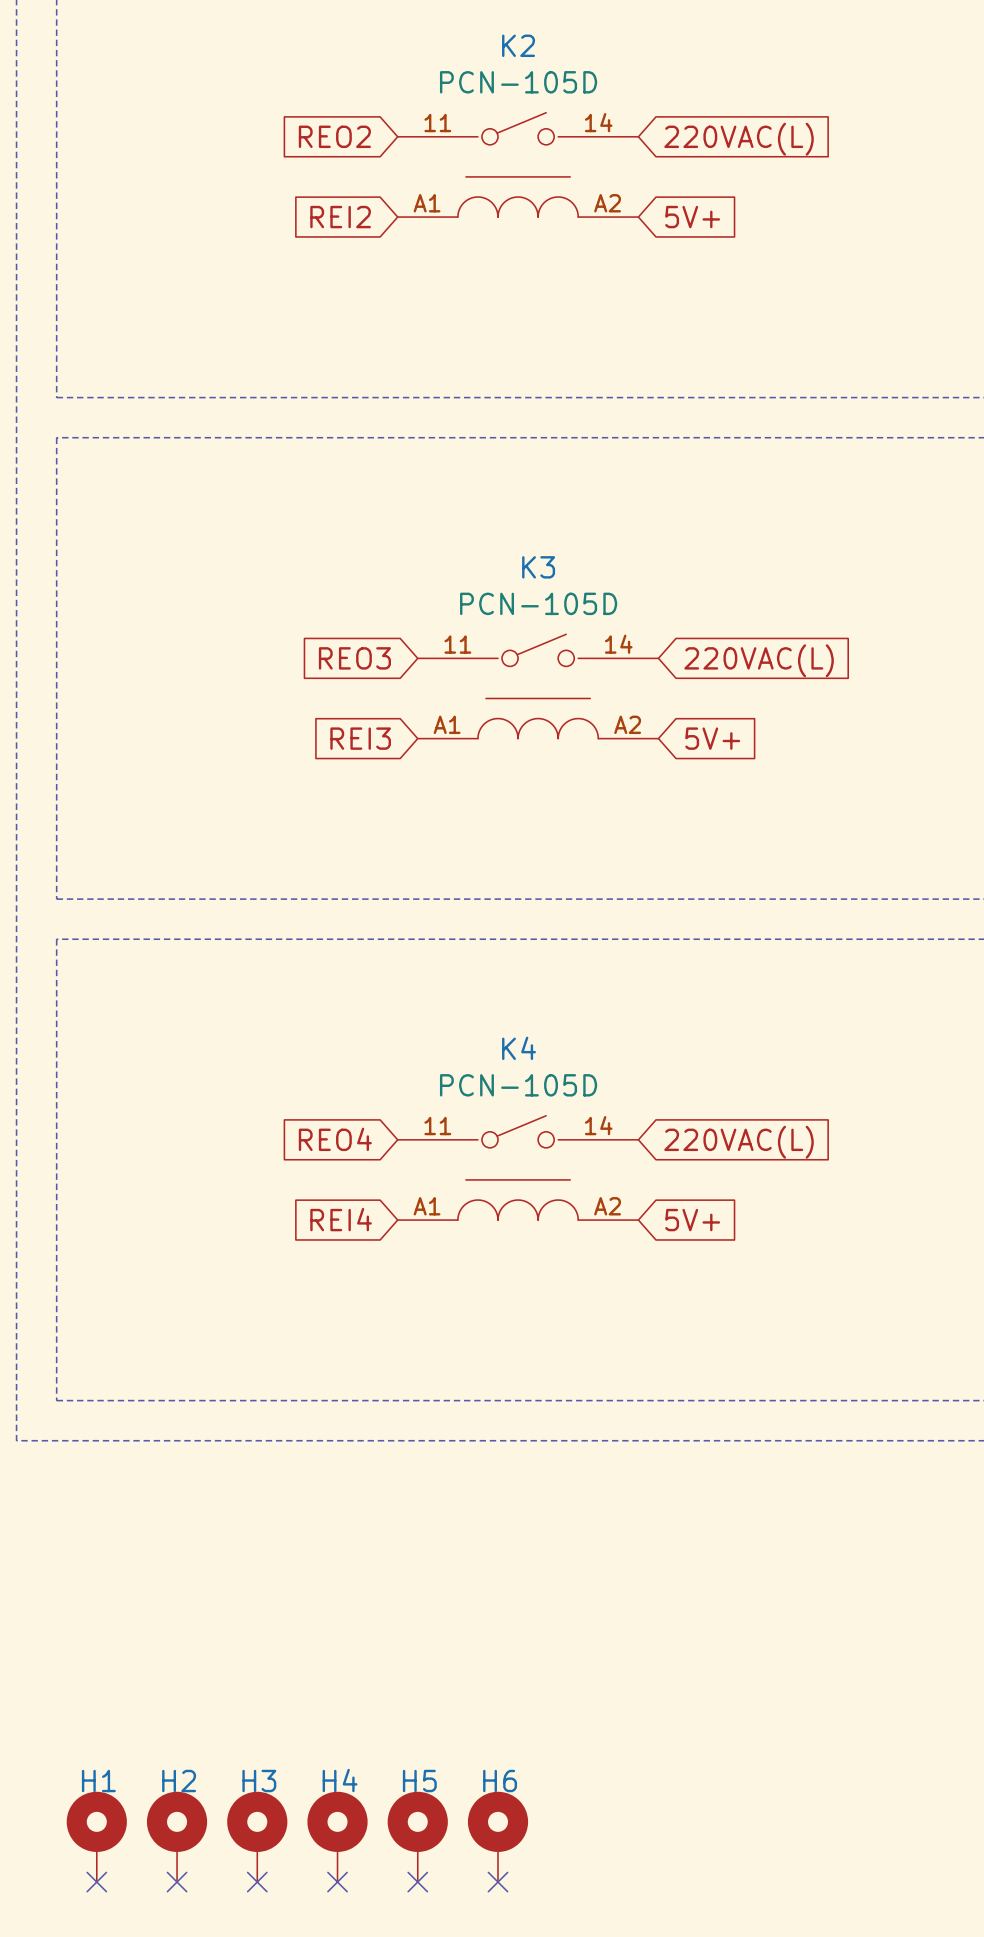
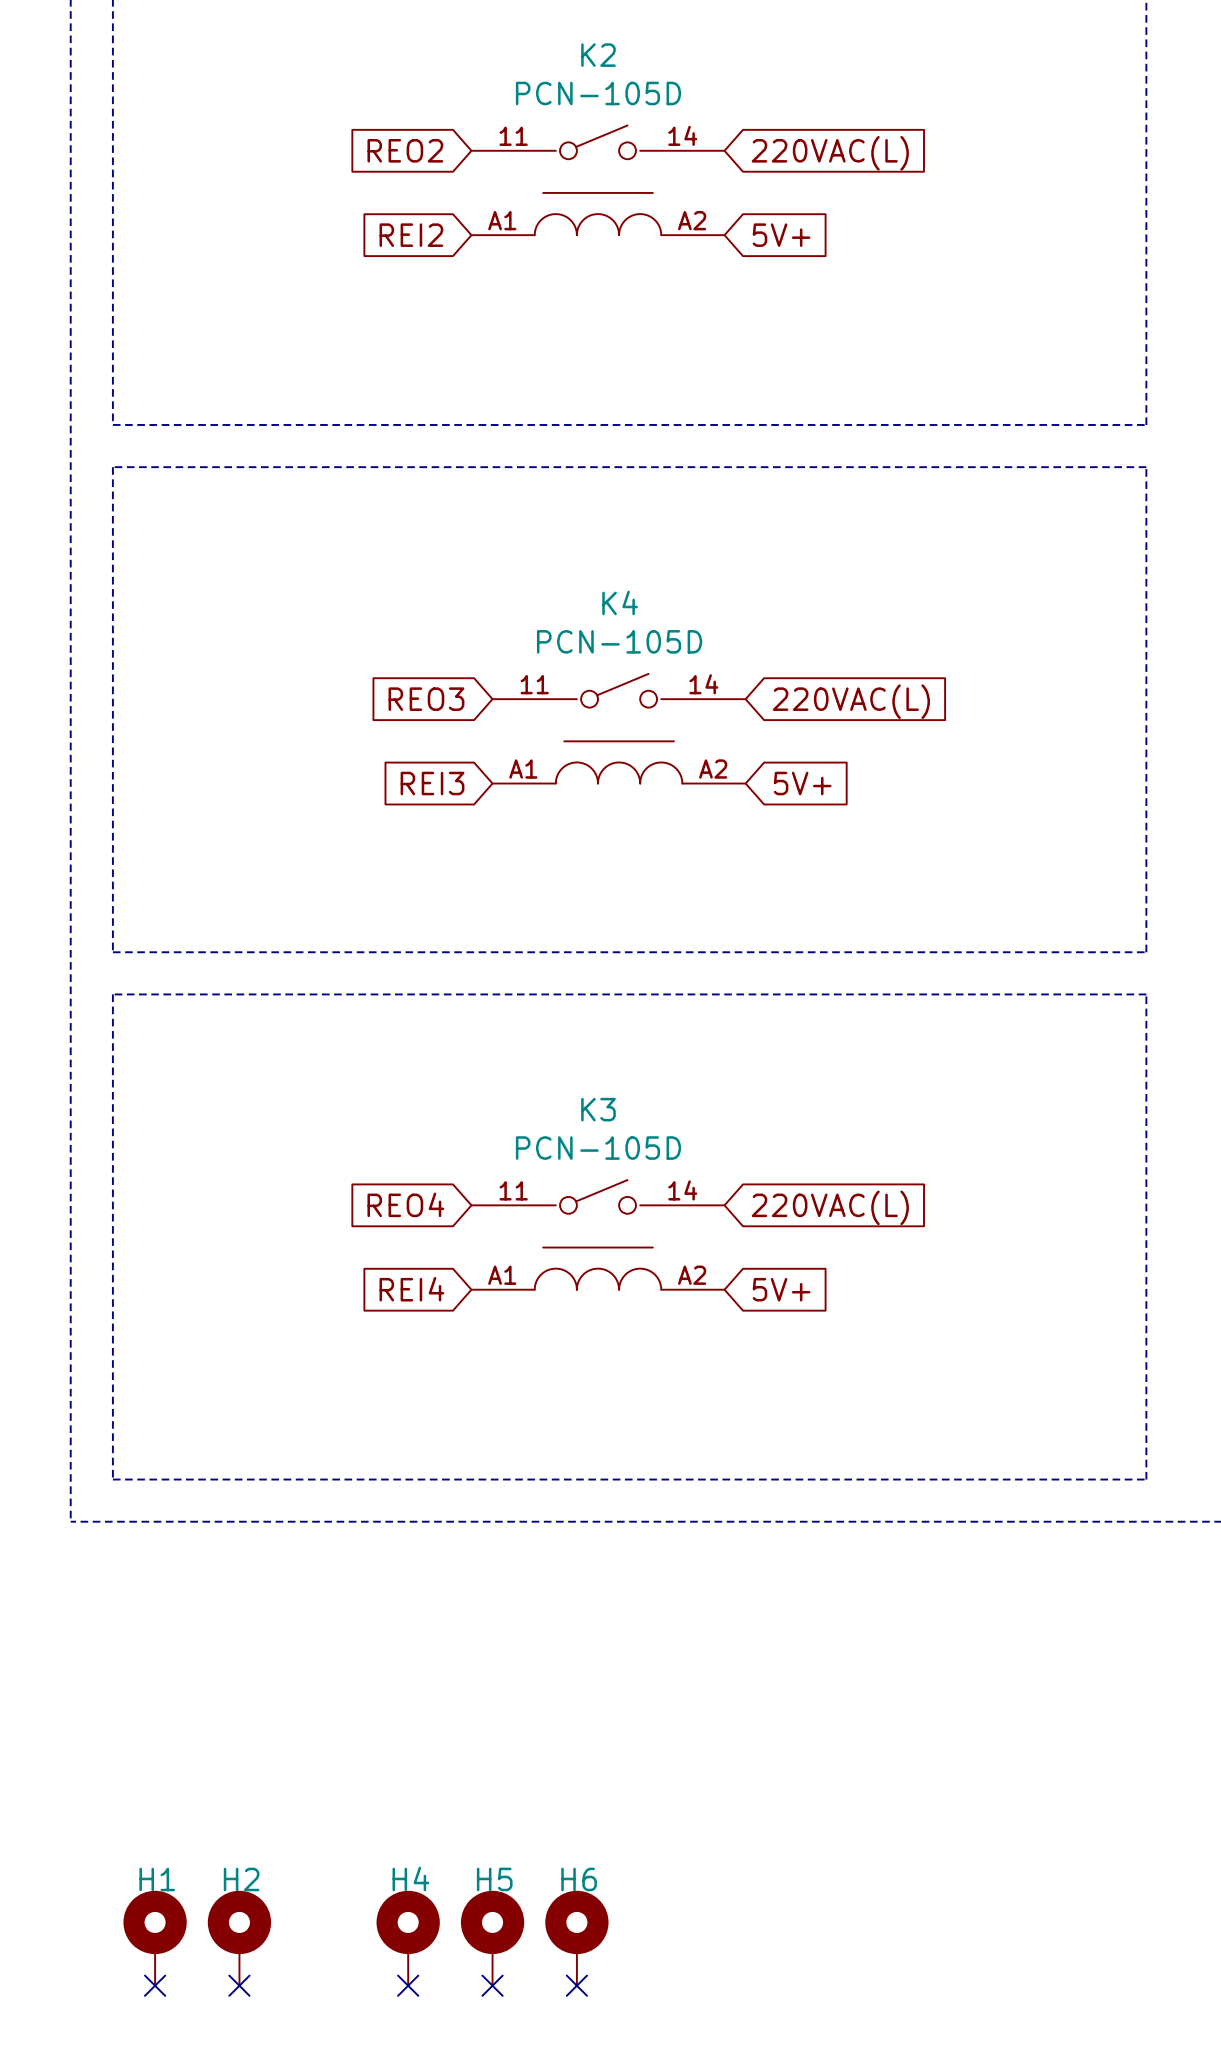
K3 name: K3 (538, 567) -> K4 (620, 602)
K4 name: K4 (519, 1048) -> K3 (598, 1109)
H3: (257, 1836) -> none
no-connect mark: (257, 1882) -> none

